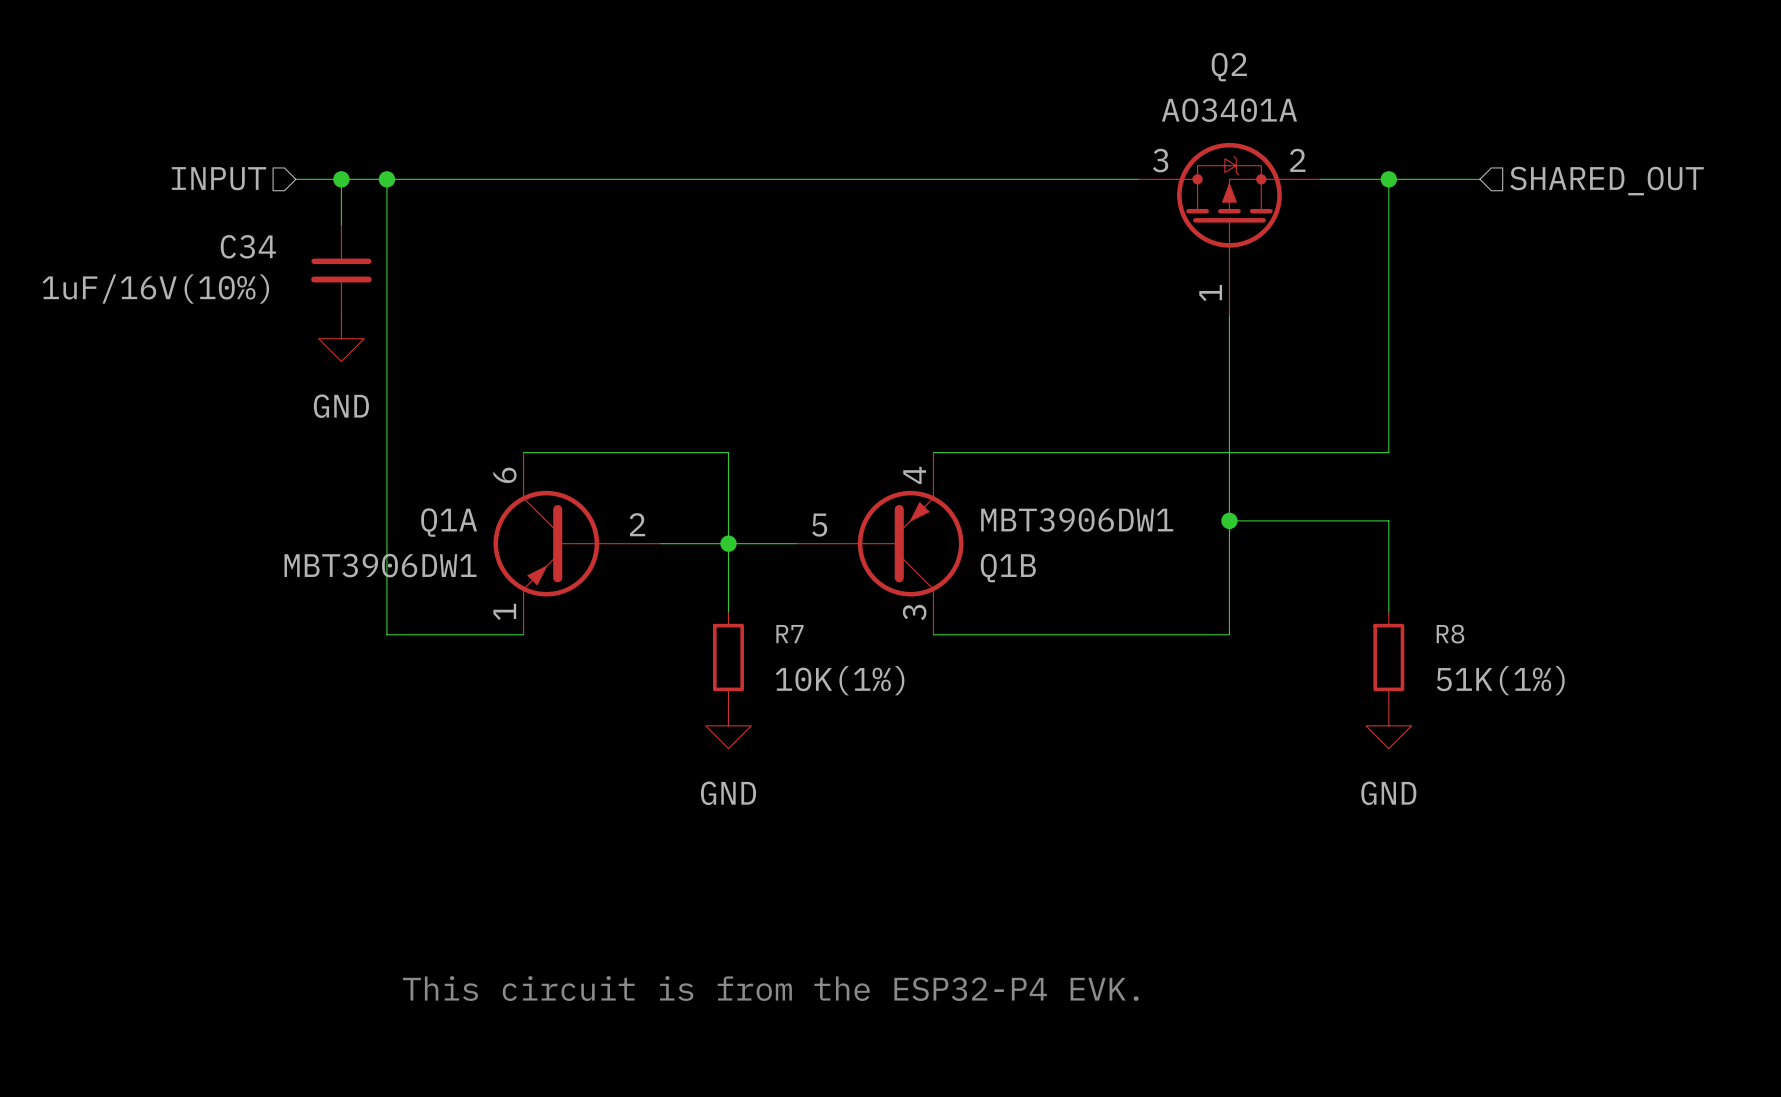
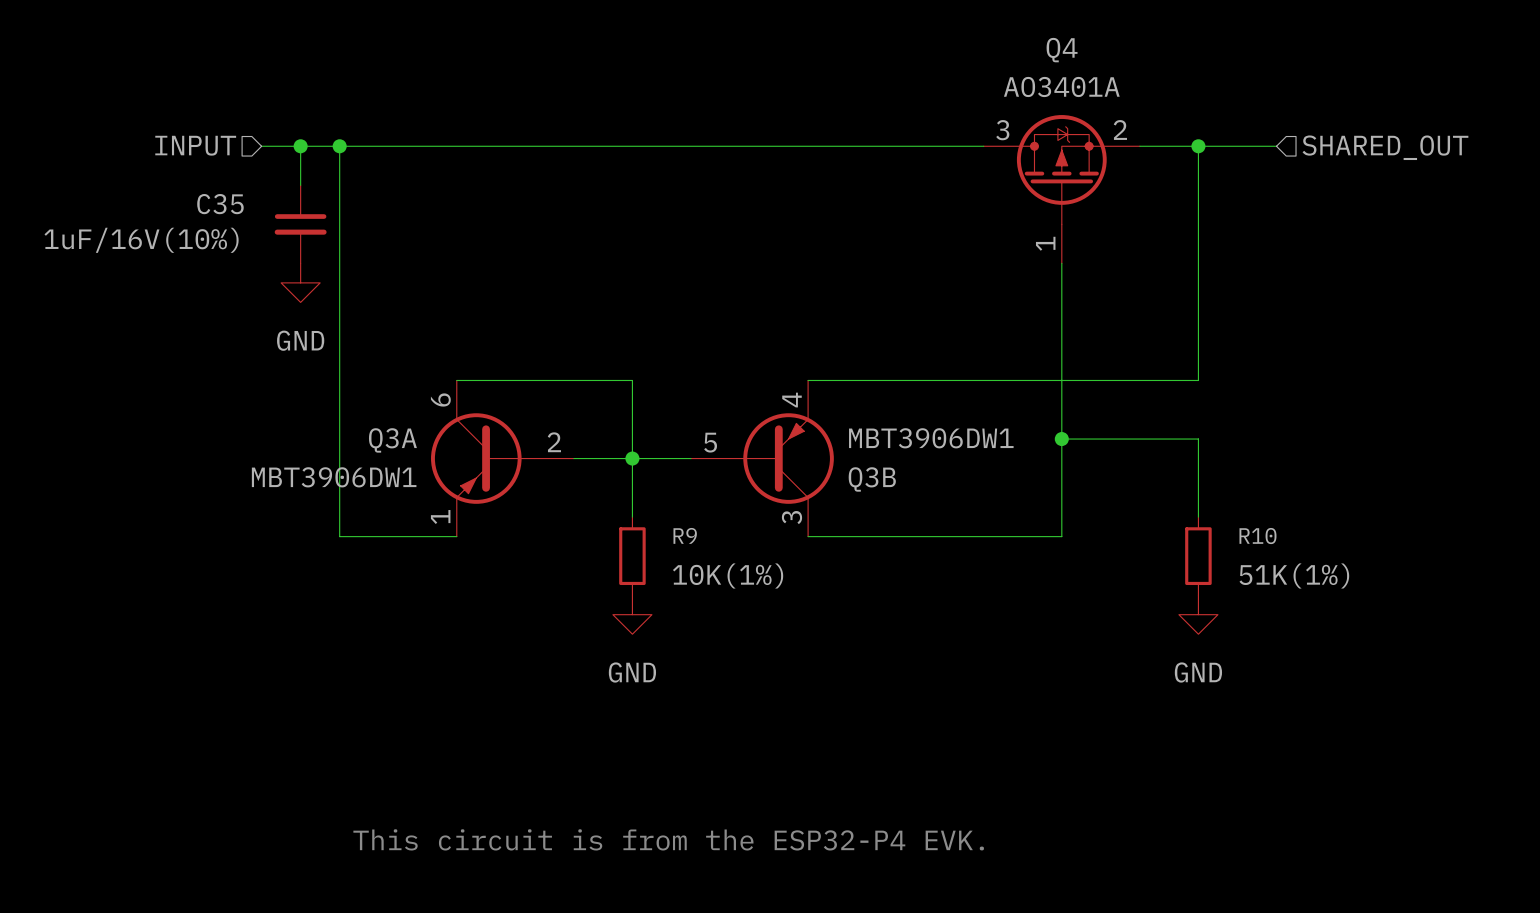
Q2 name: Q2 (1229, 67) -> Q4 (1062, 50)
C34 name: C34 (248, 246) -> C35 (220, 204)
Q1A name: Q1A (449, 522) -> Q3A (392, 440)
Q1B name: Q1B (1008, 568) -> Q3B (872, 479)
R7 name: R7 (789, 634) -> R9 (685, 535)
R8 name: R8 (1450, 634) -> R10 (1257, 536)

